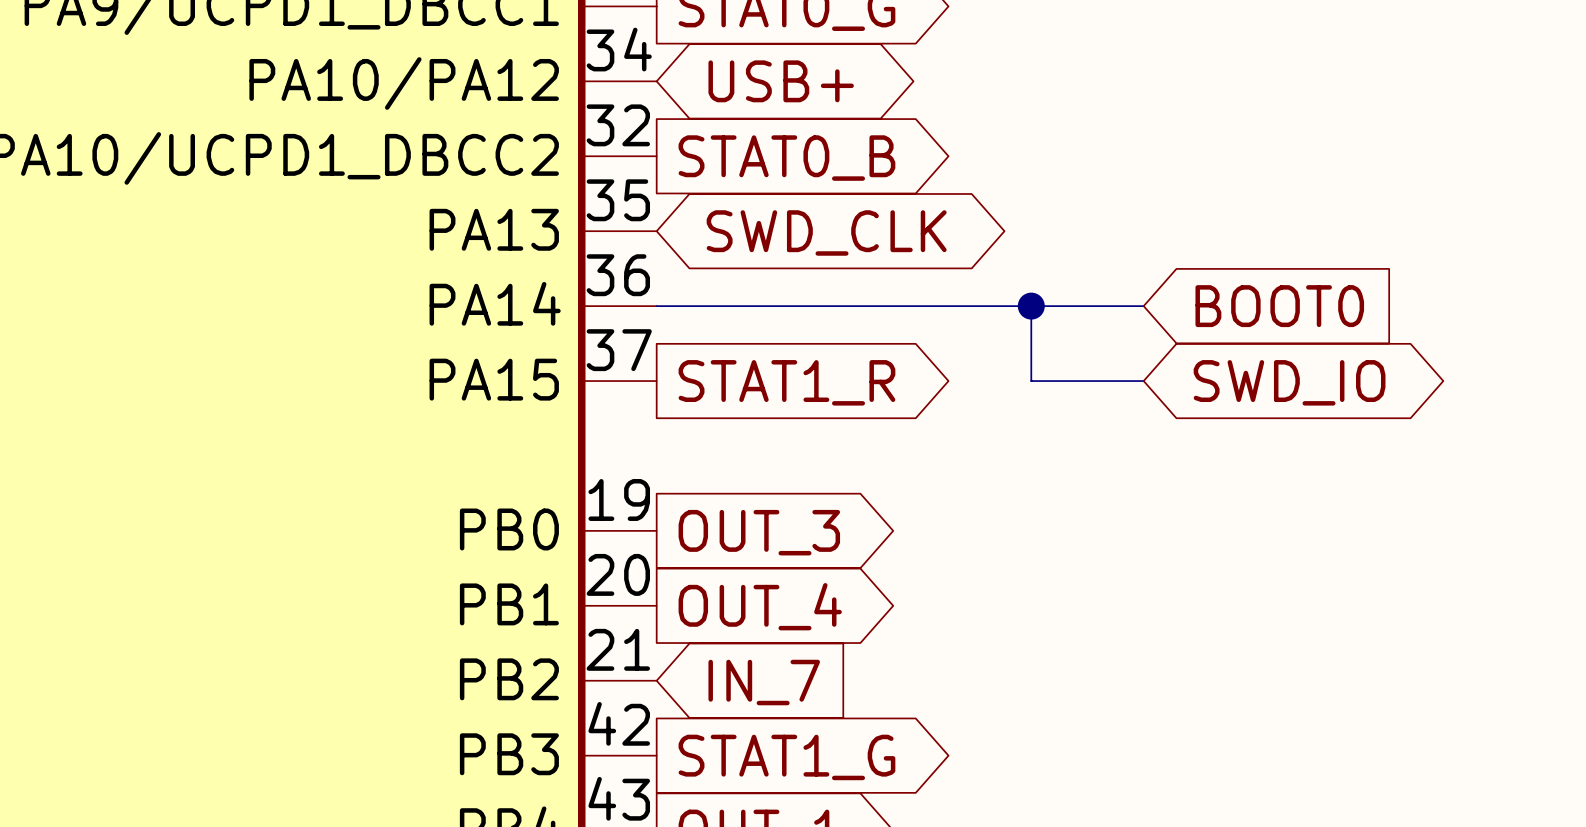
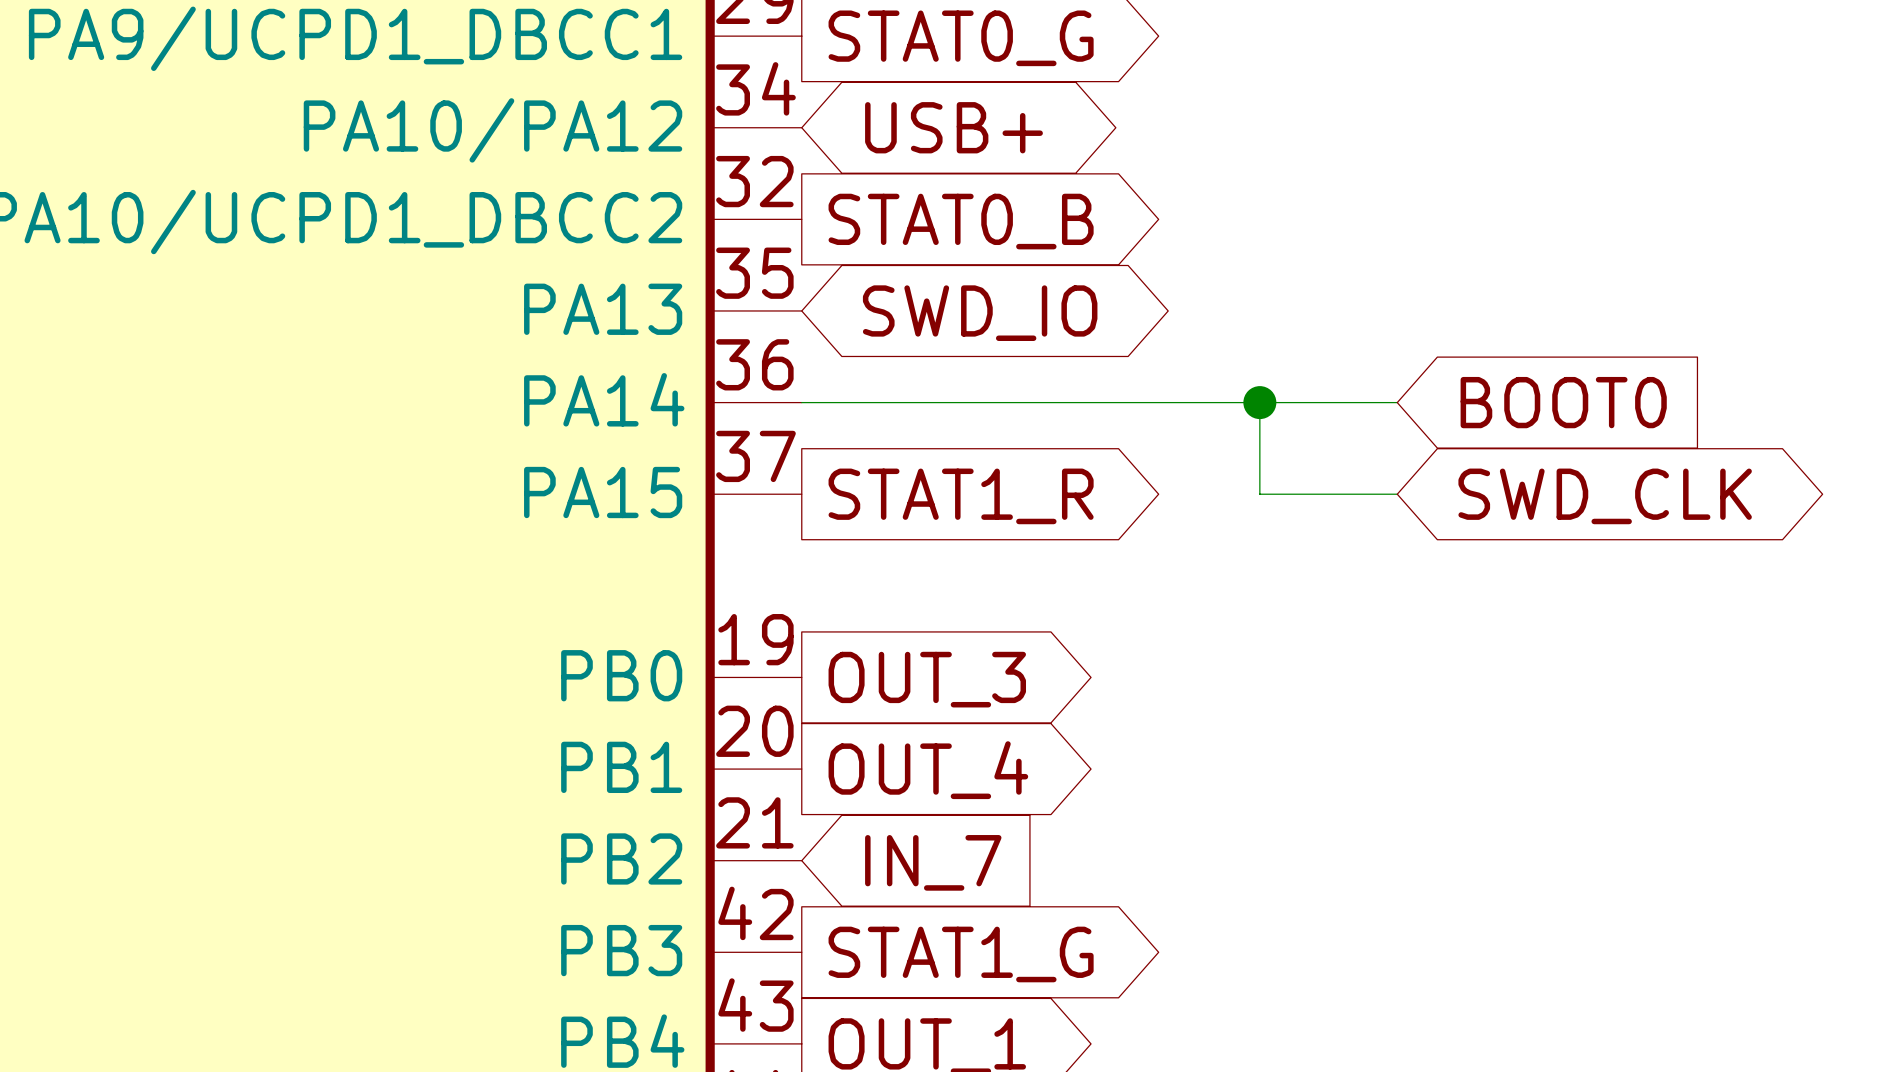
global label: SWD_CLK (826, 232) -> SWD_IO (980, 313)
global label: SWD_IO (1289, 382) -> SWD_CLK (1605, 496)

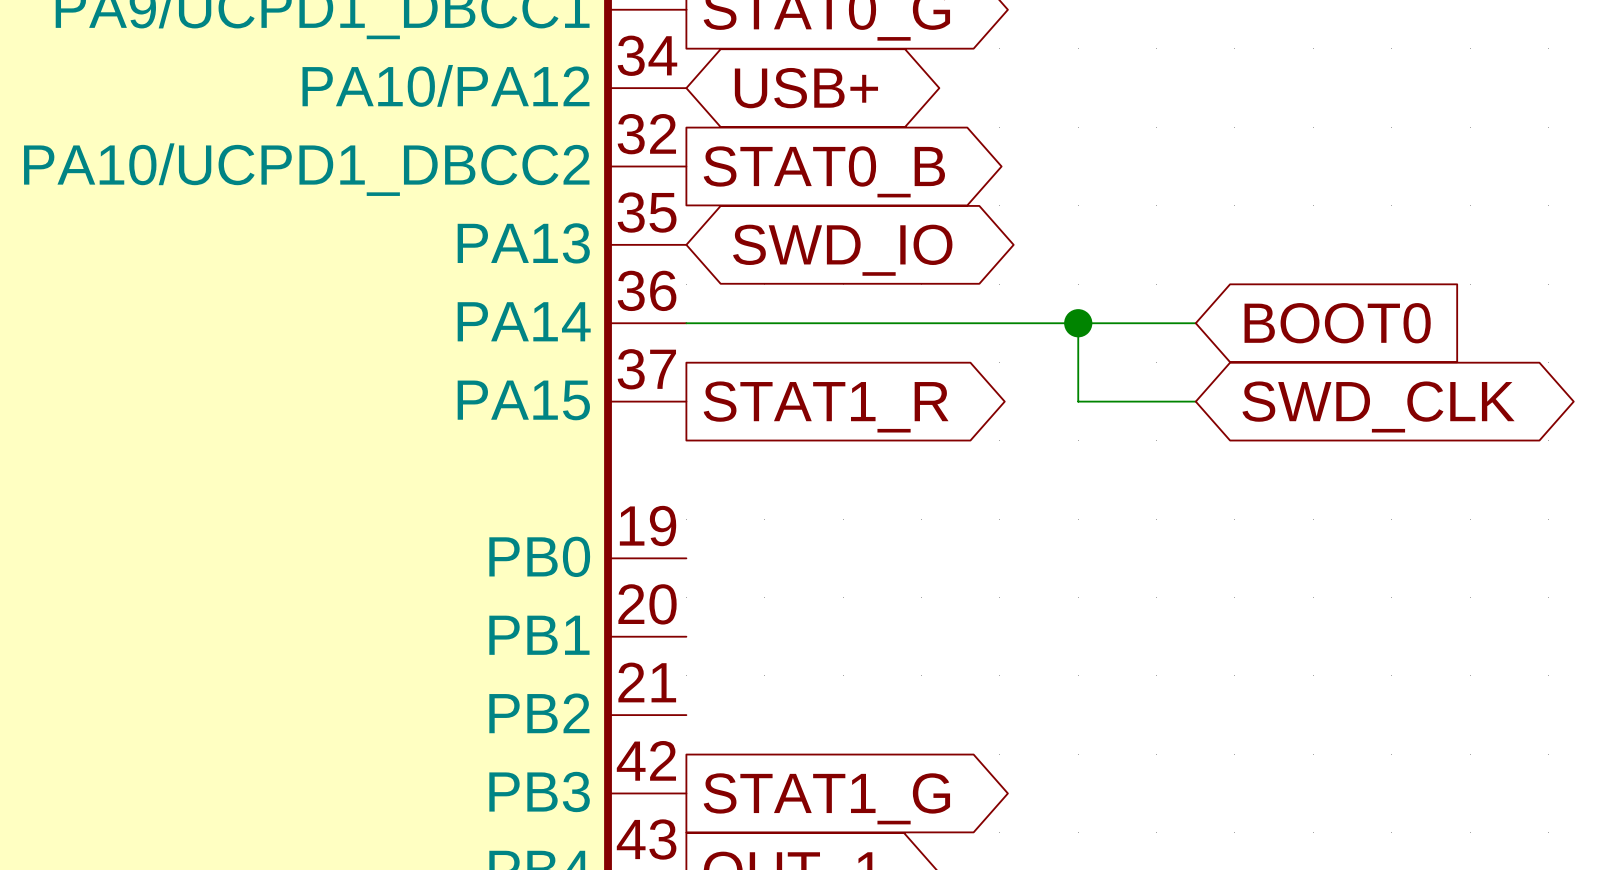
global label: OUT_3 (927, 679) -> none
global label: OUT_4 (928, 770) -> none
global label: IN_7 (933, 862) -> none

